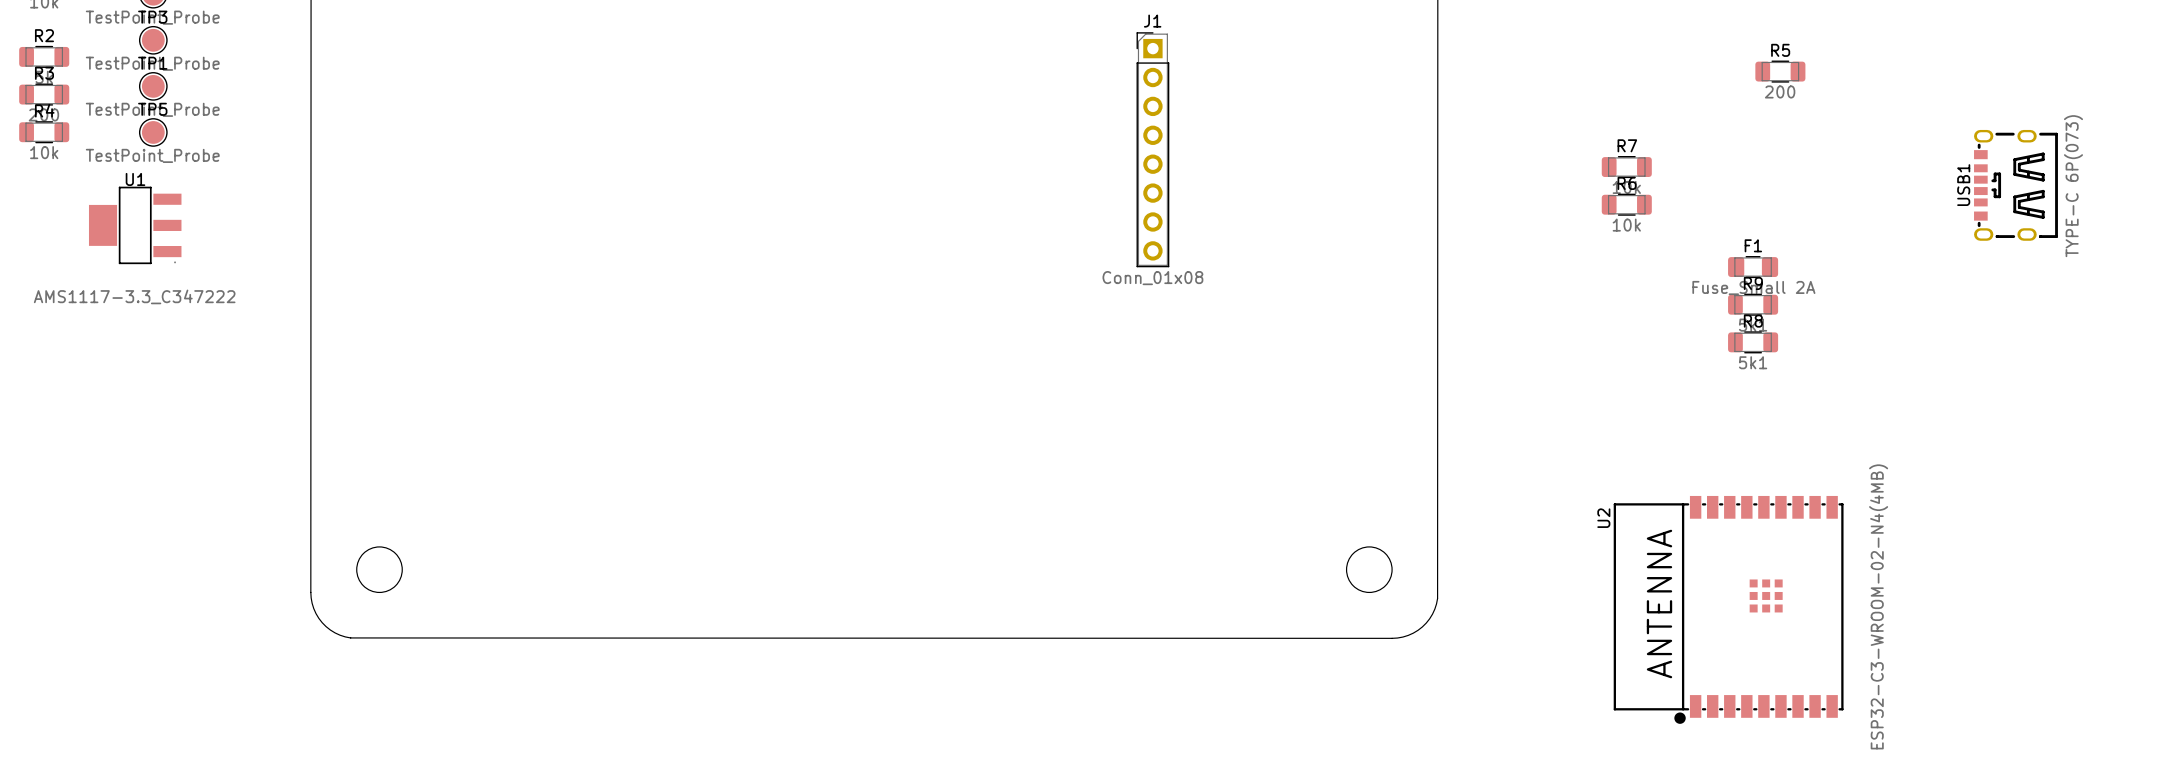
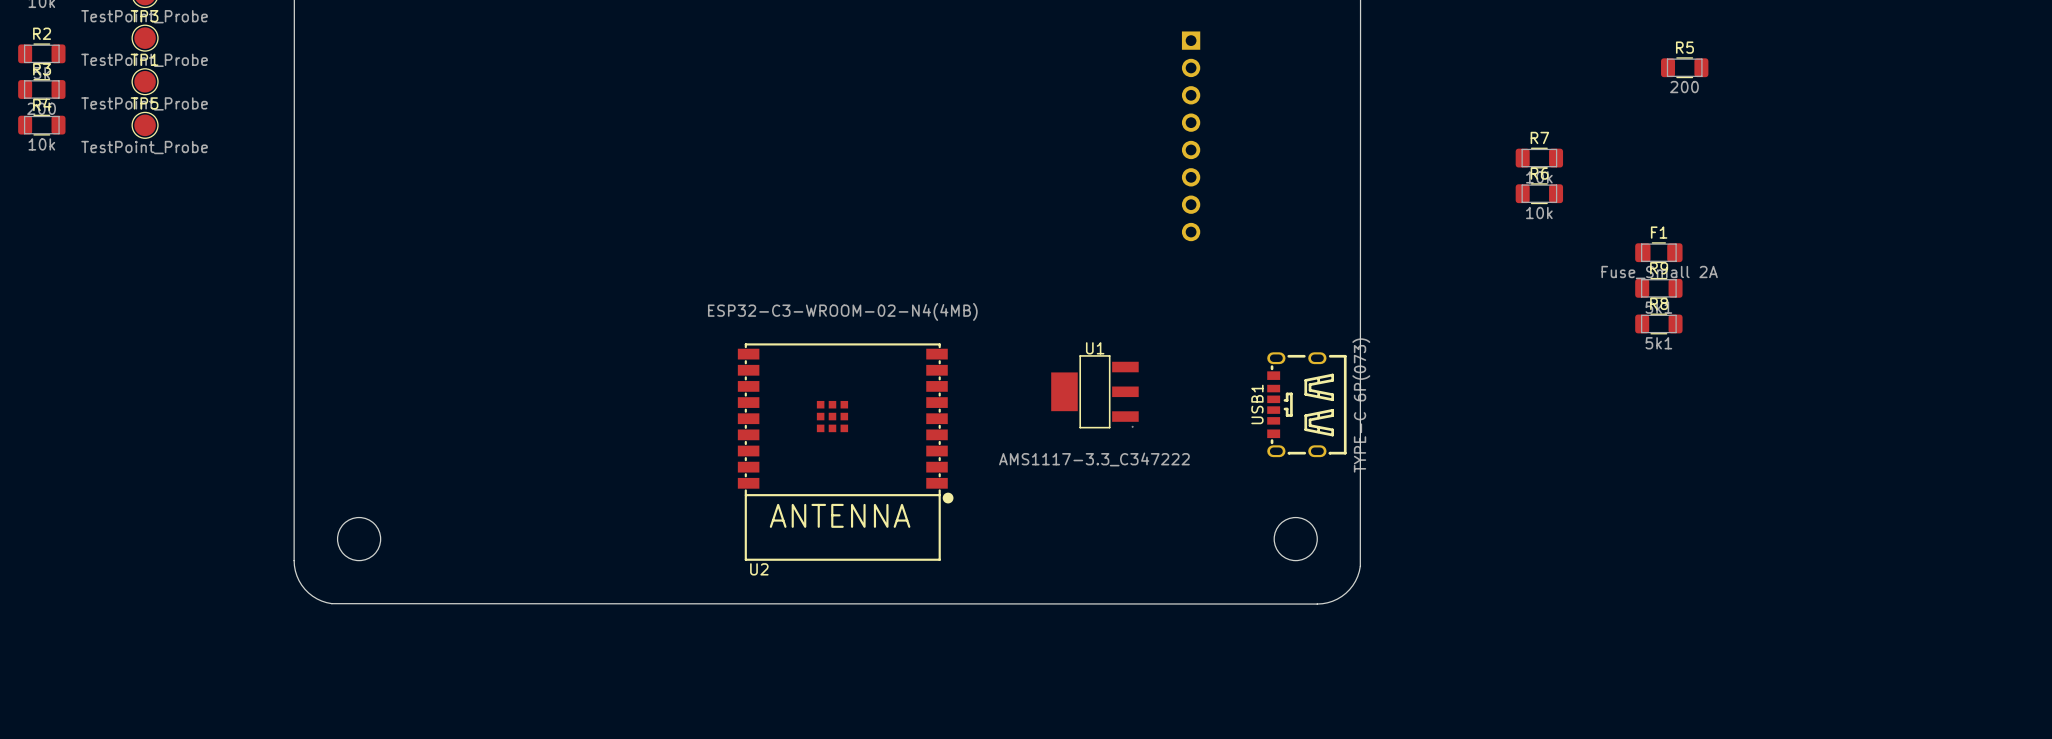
part: none -> (1191, 136)
J1: Conn_01x08 (1152, 149) -> none
USB1 position: (2015, 185) -> (1306, 404)
U1 position: (135, 225) -> (1094, 391)
U2 rotation: 0° (1728, 609) -> 90° counterclockwise (845, 452)
U2 position: (1728, 609) -> (845, 452)

